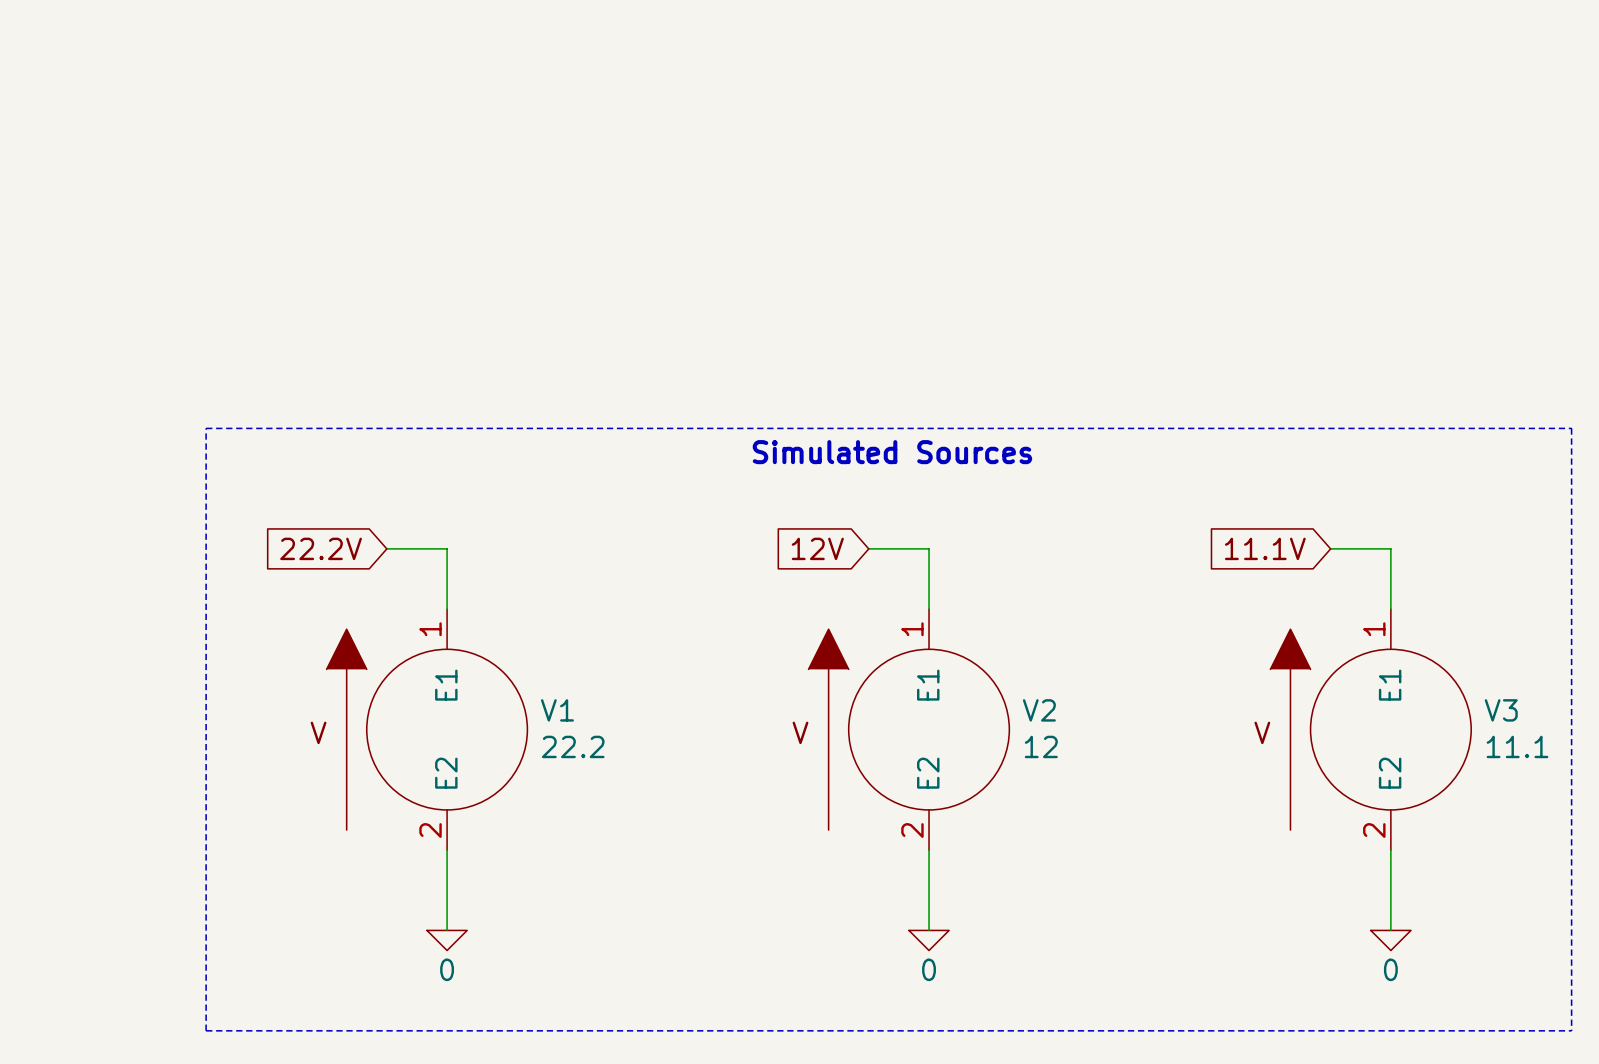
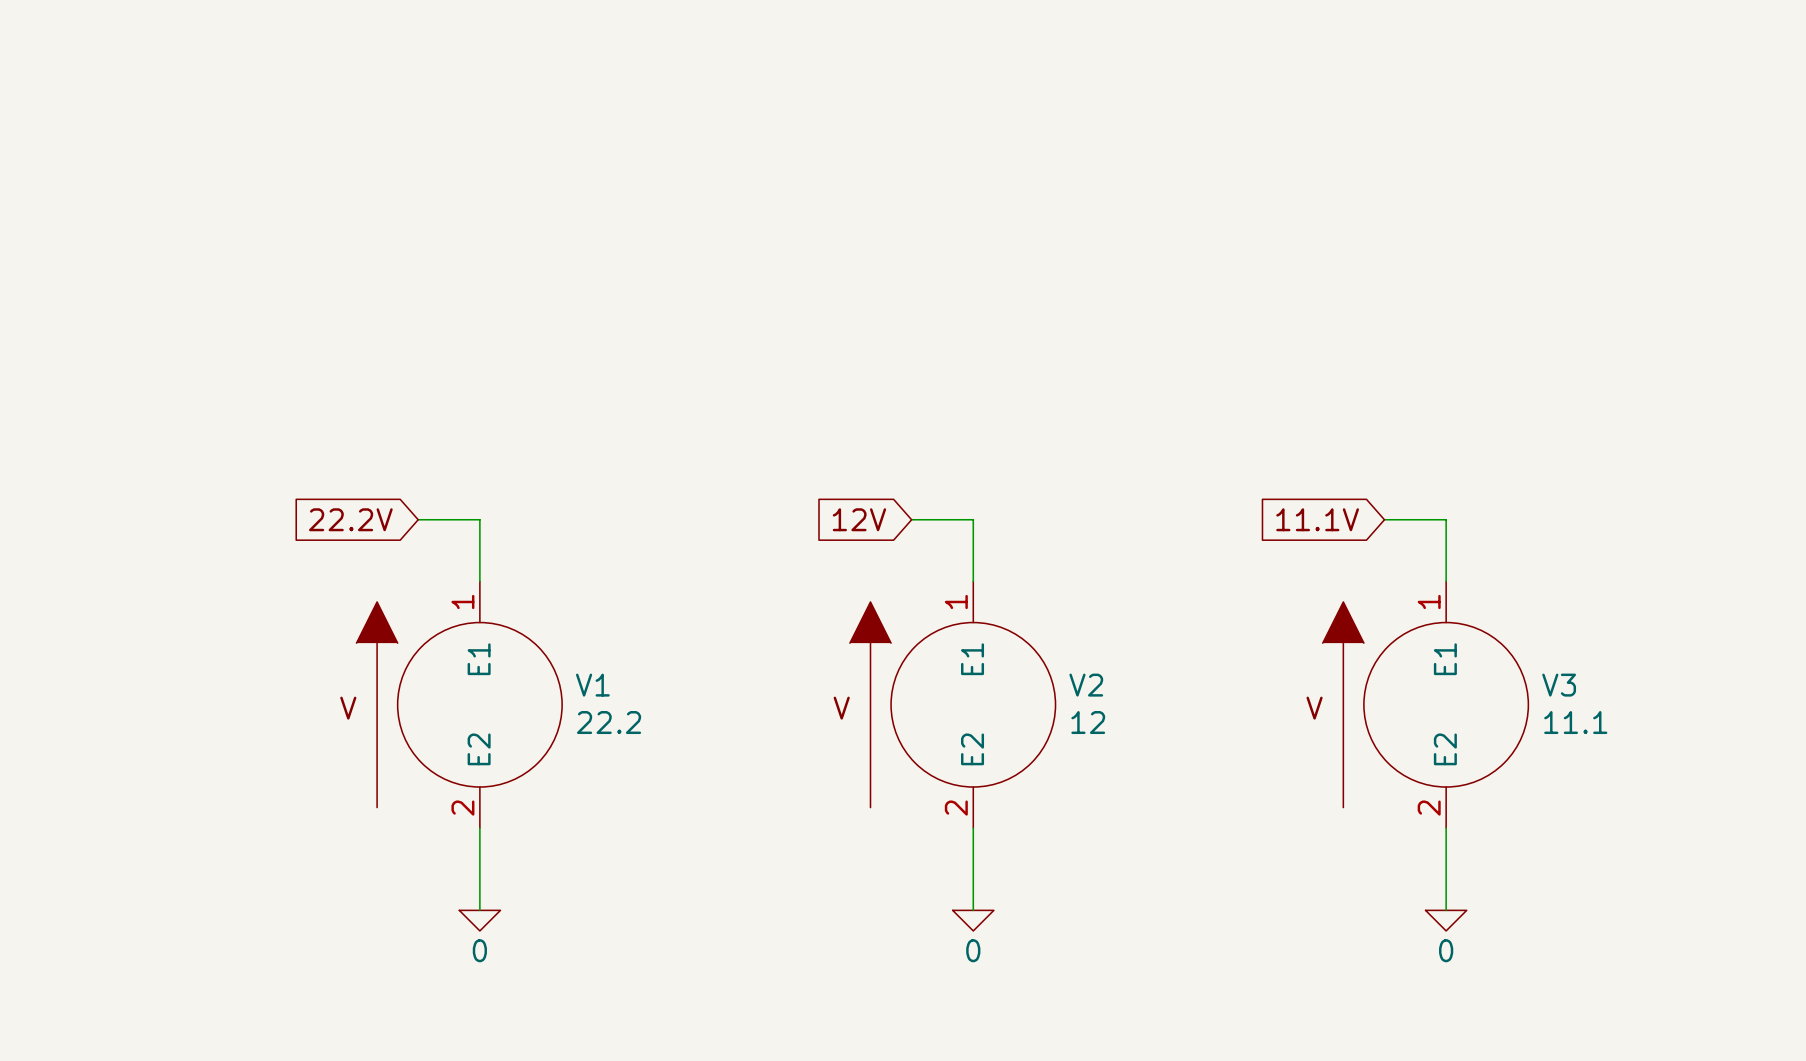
line: (206, 428) (206, 1030) (1571, 1030) (1571, 428) (206, 428) -> none
text: Simulated Sources (892, 452) -> none

